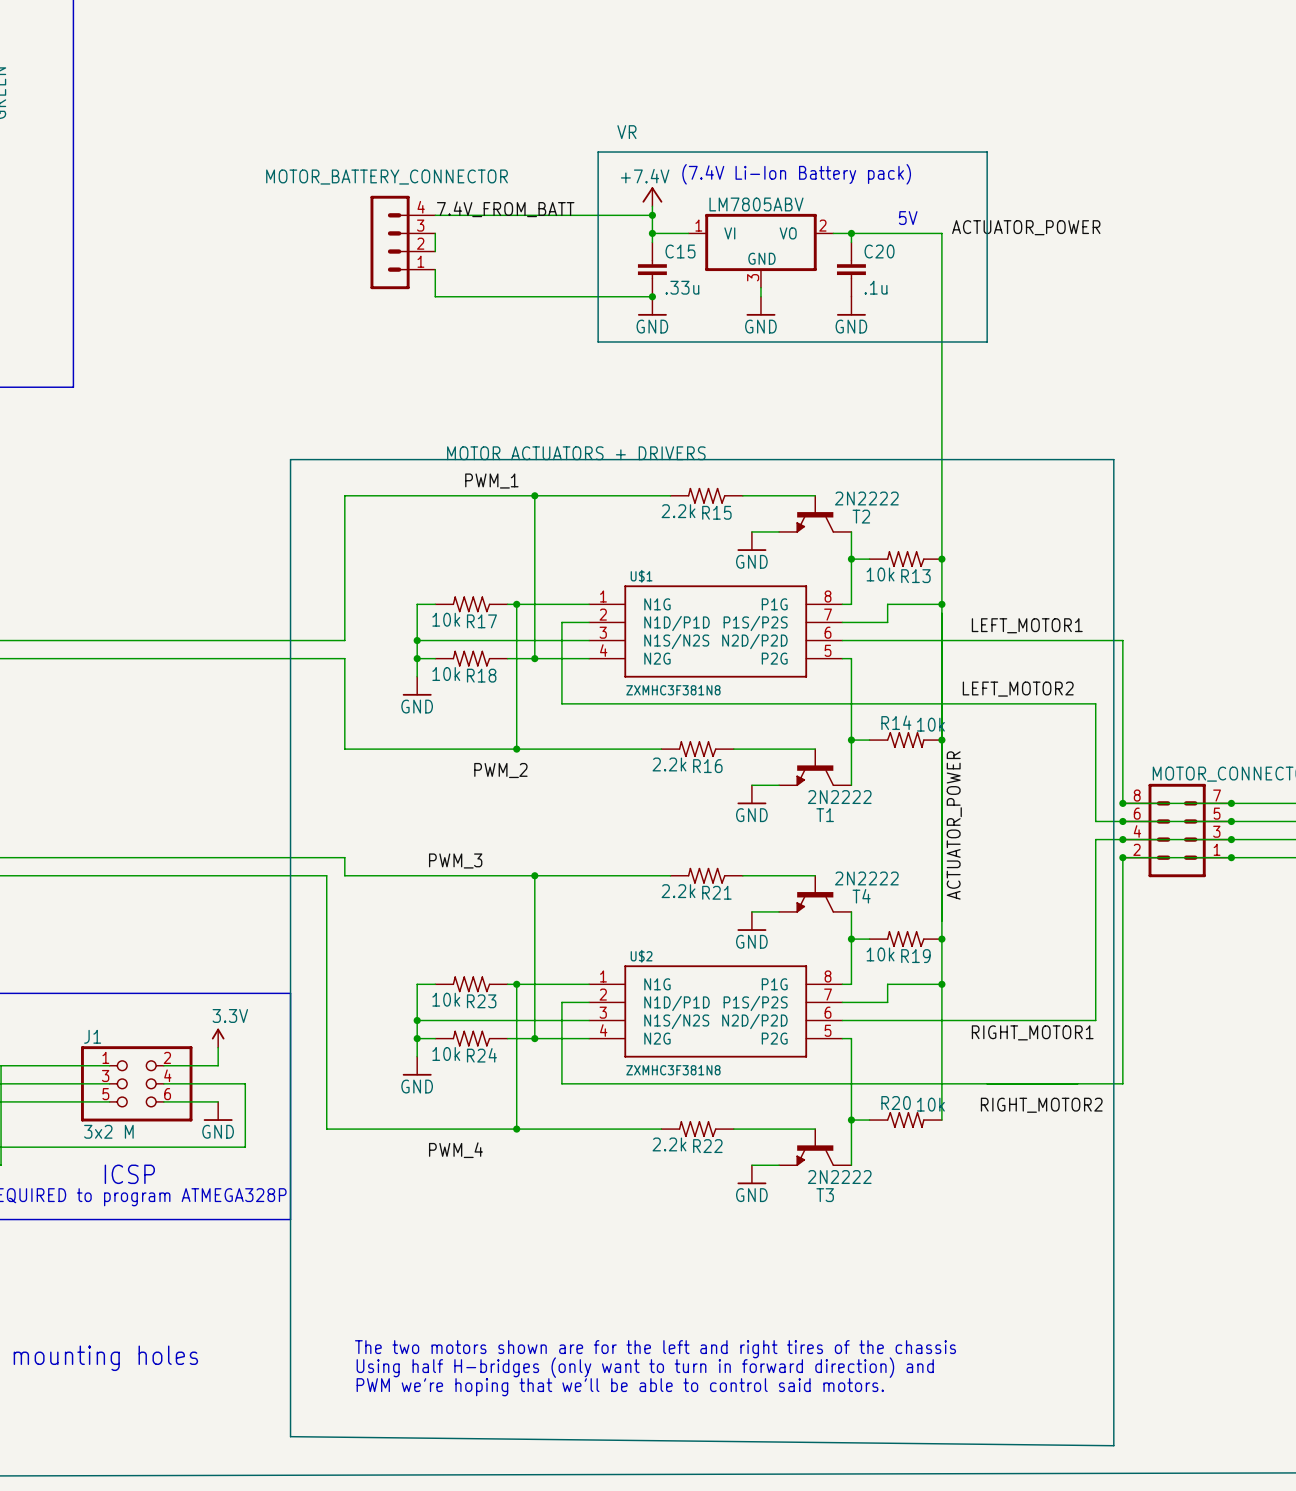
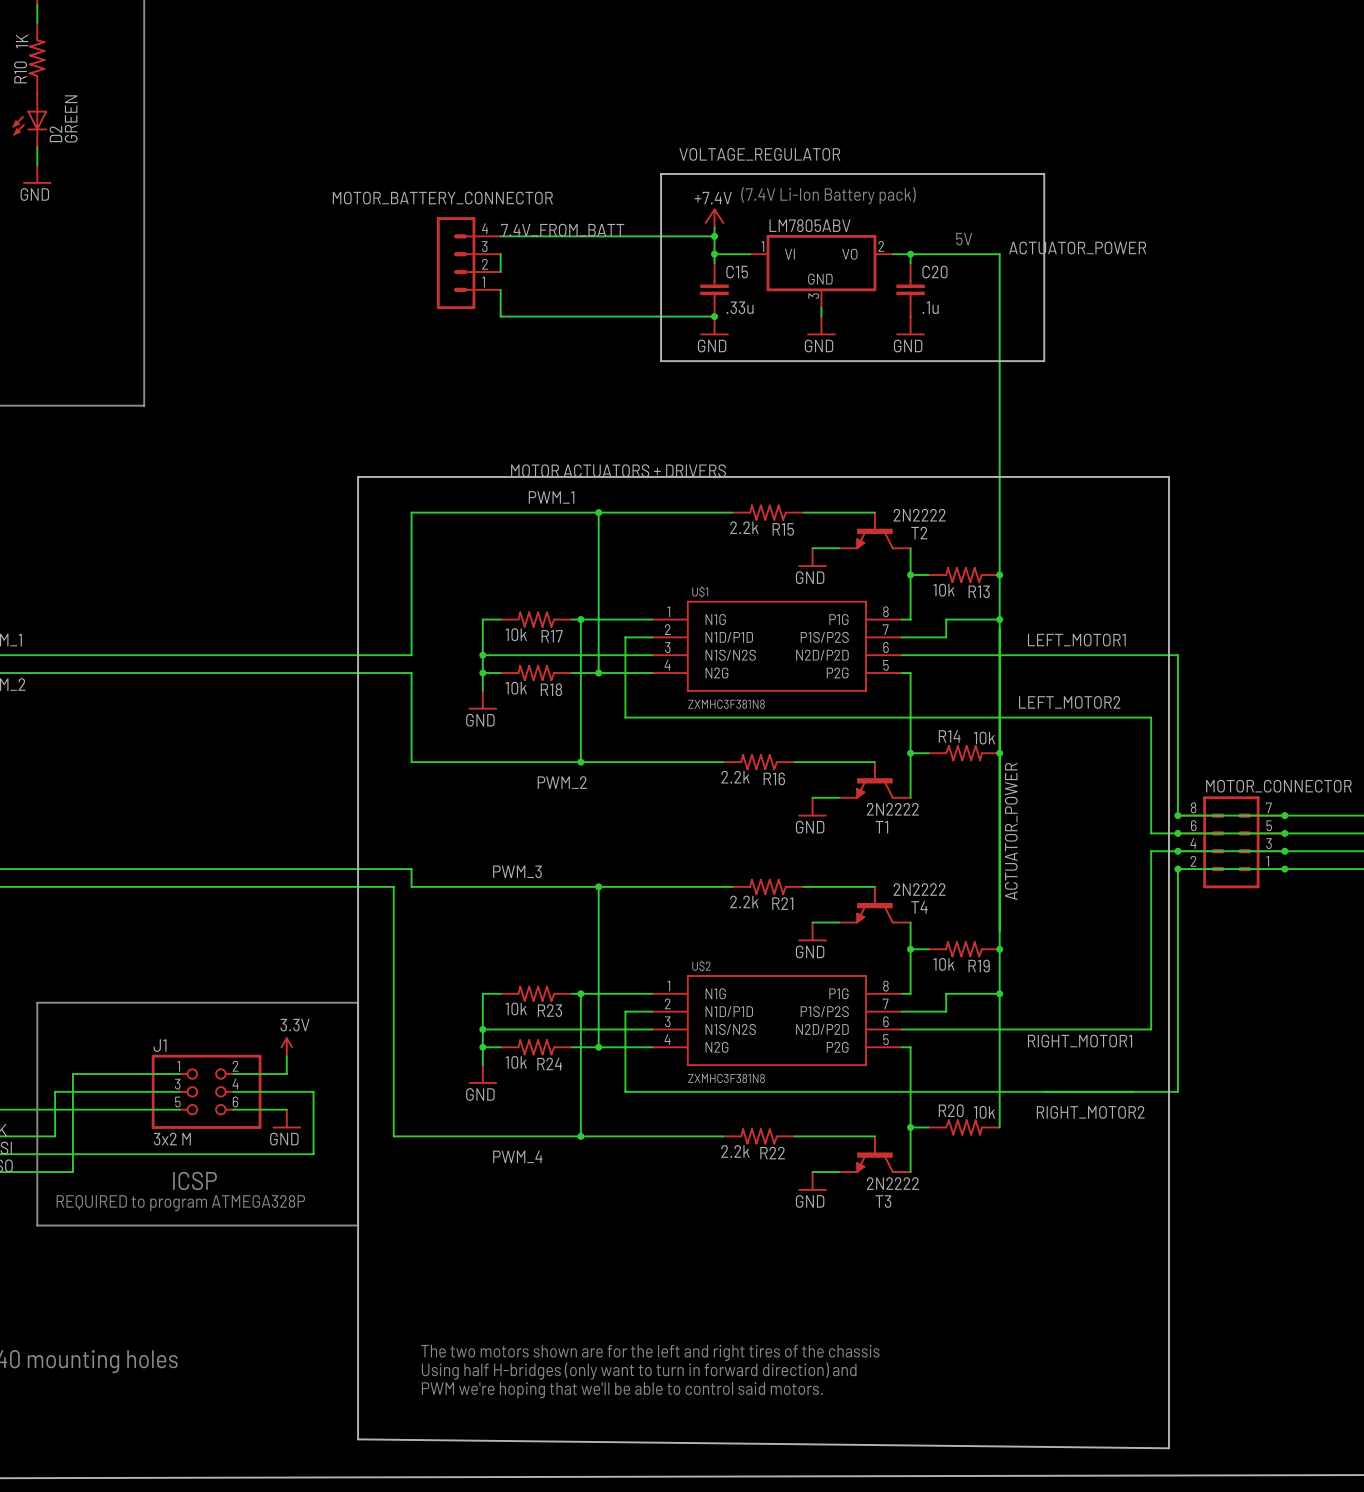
VR name: VR (626, 132) -> VOLTAGE_REGULATOR (759, 154)

